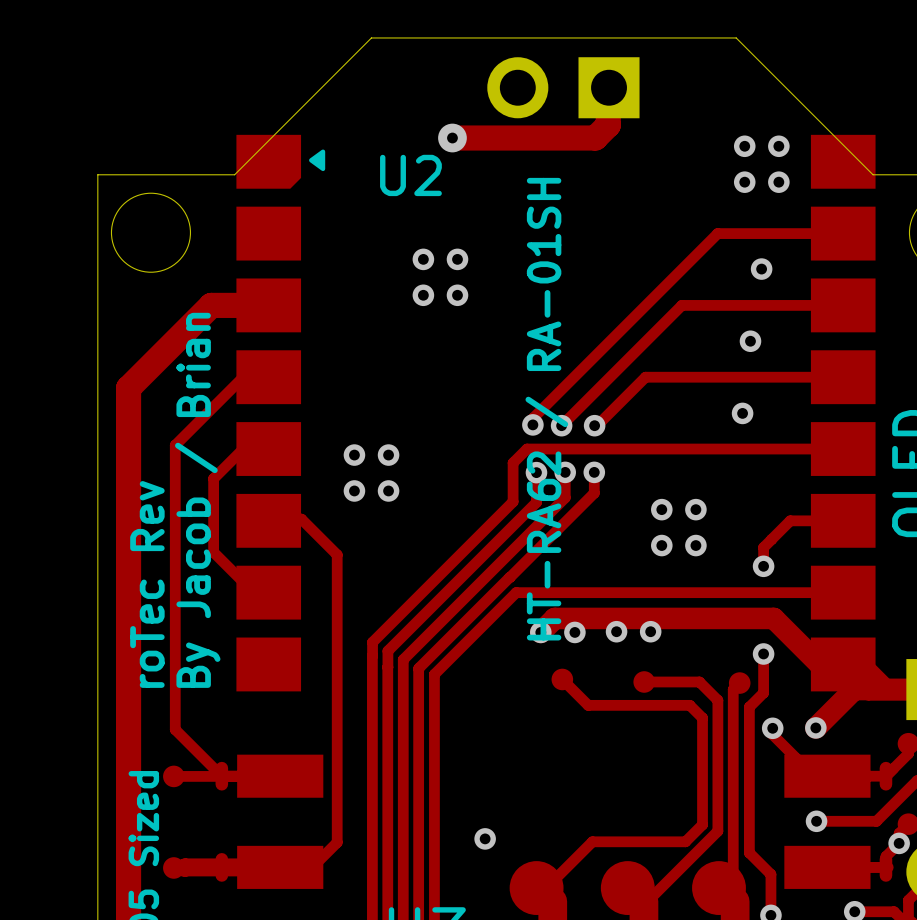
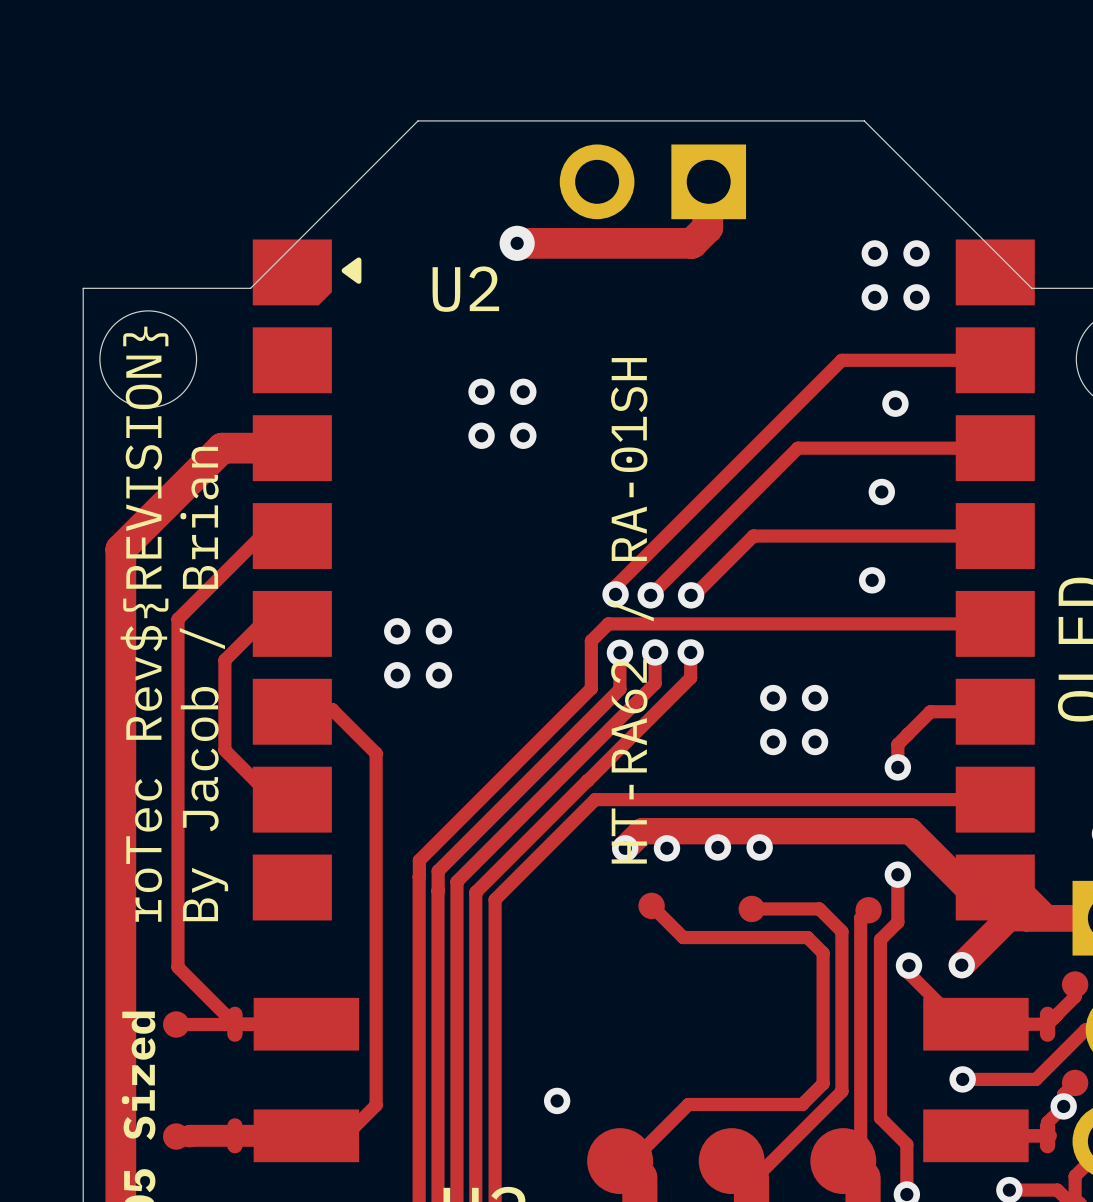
text: roTec Rev (147, 584) -> roTec Rev${REVISION} (144, 624)

